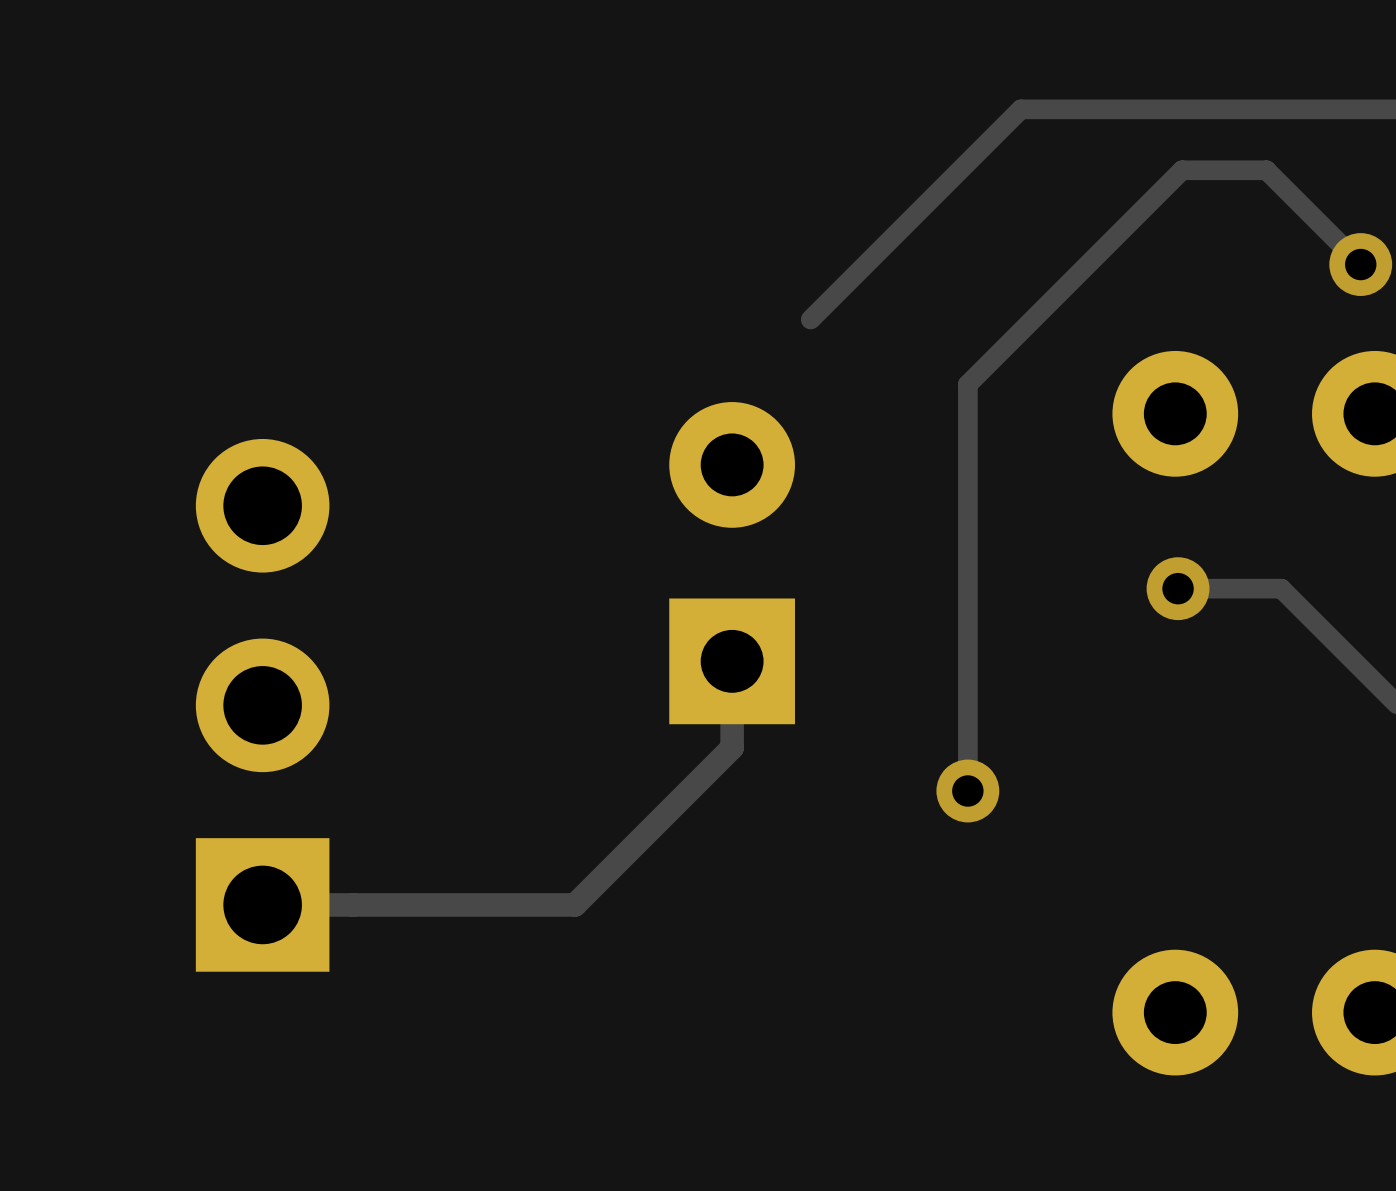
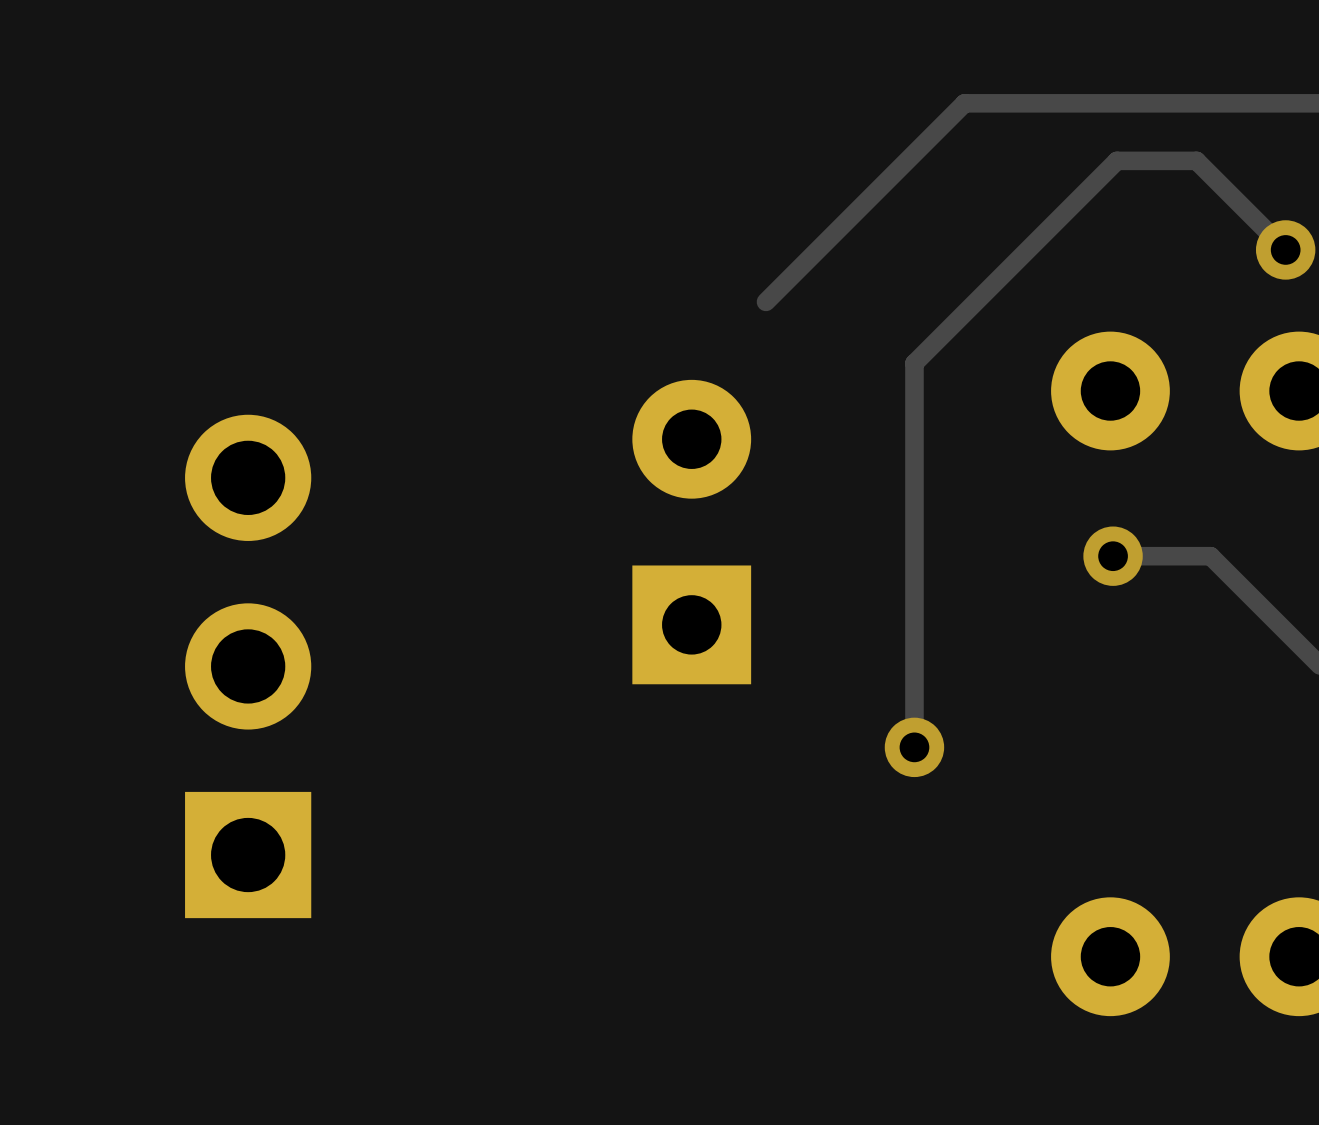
track: (732, 661) (732, 747) (574, 904) (262, 904) -> none

